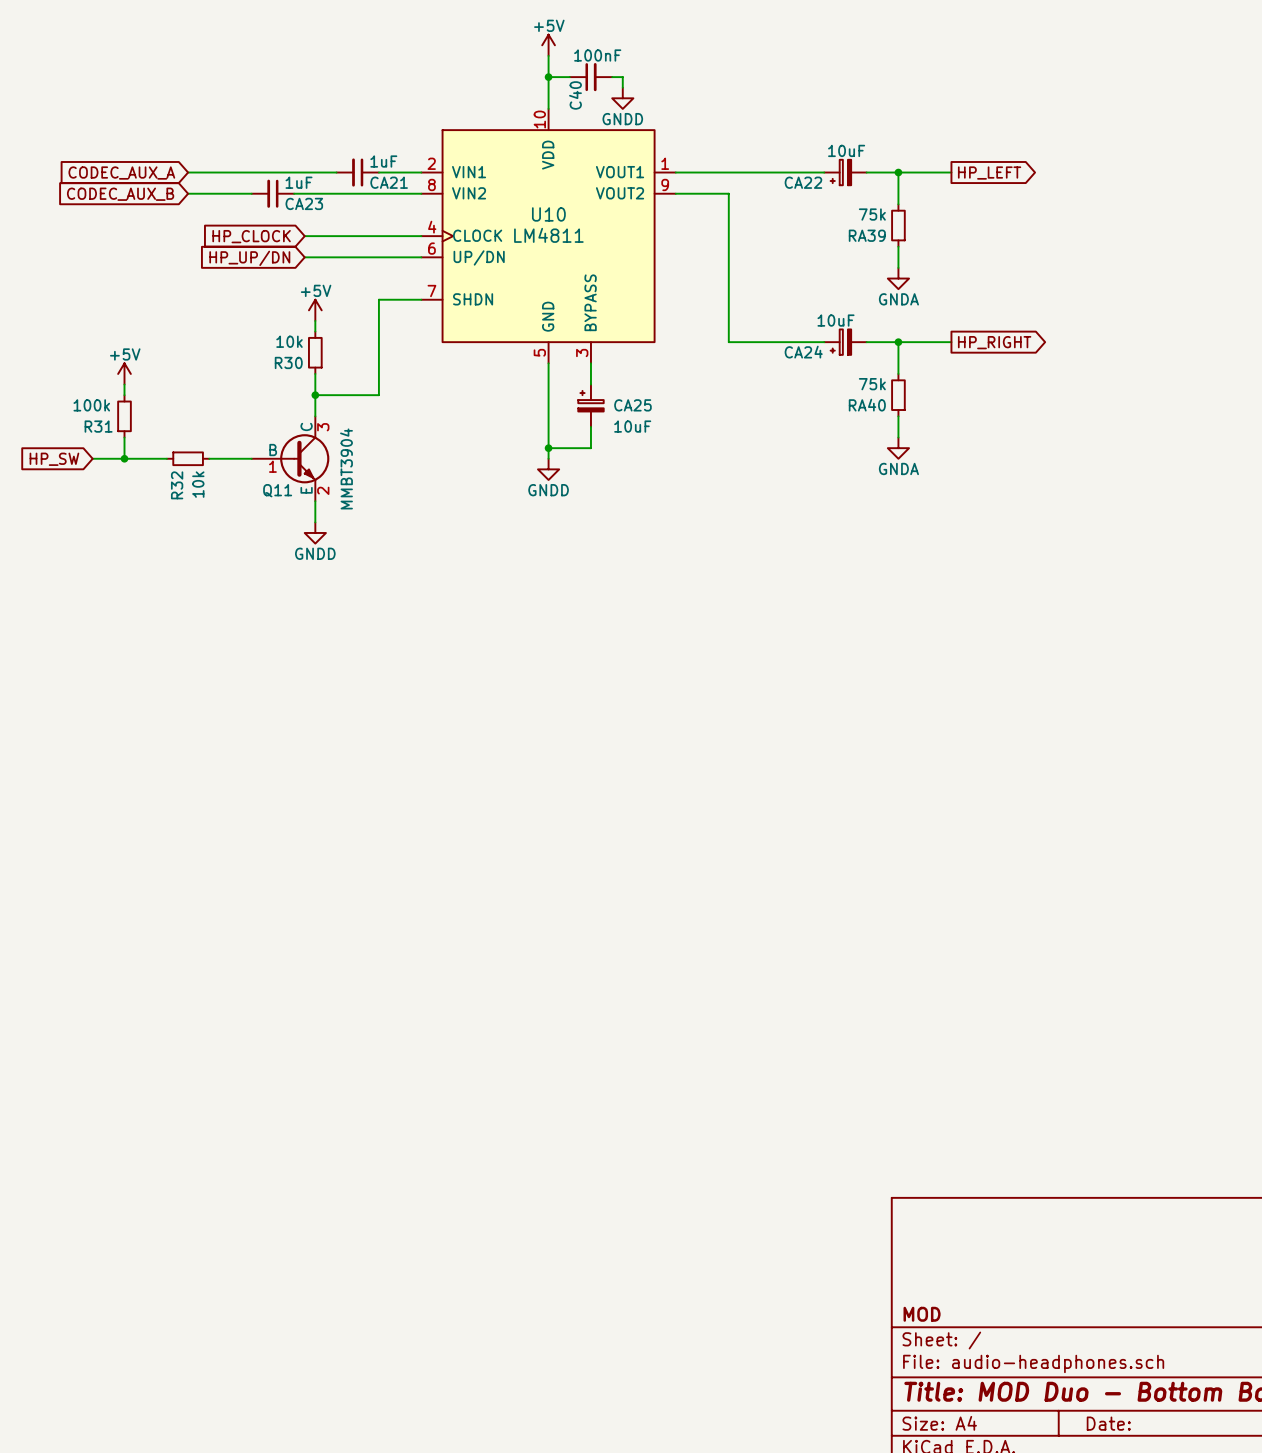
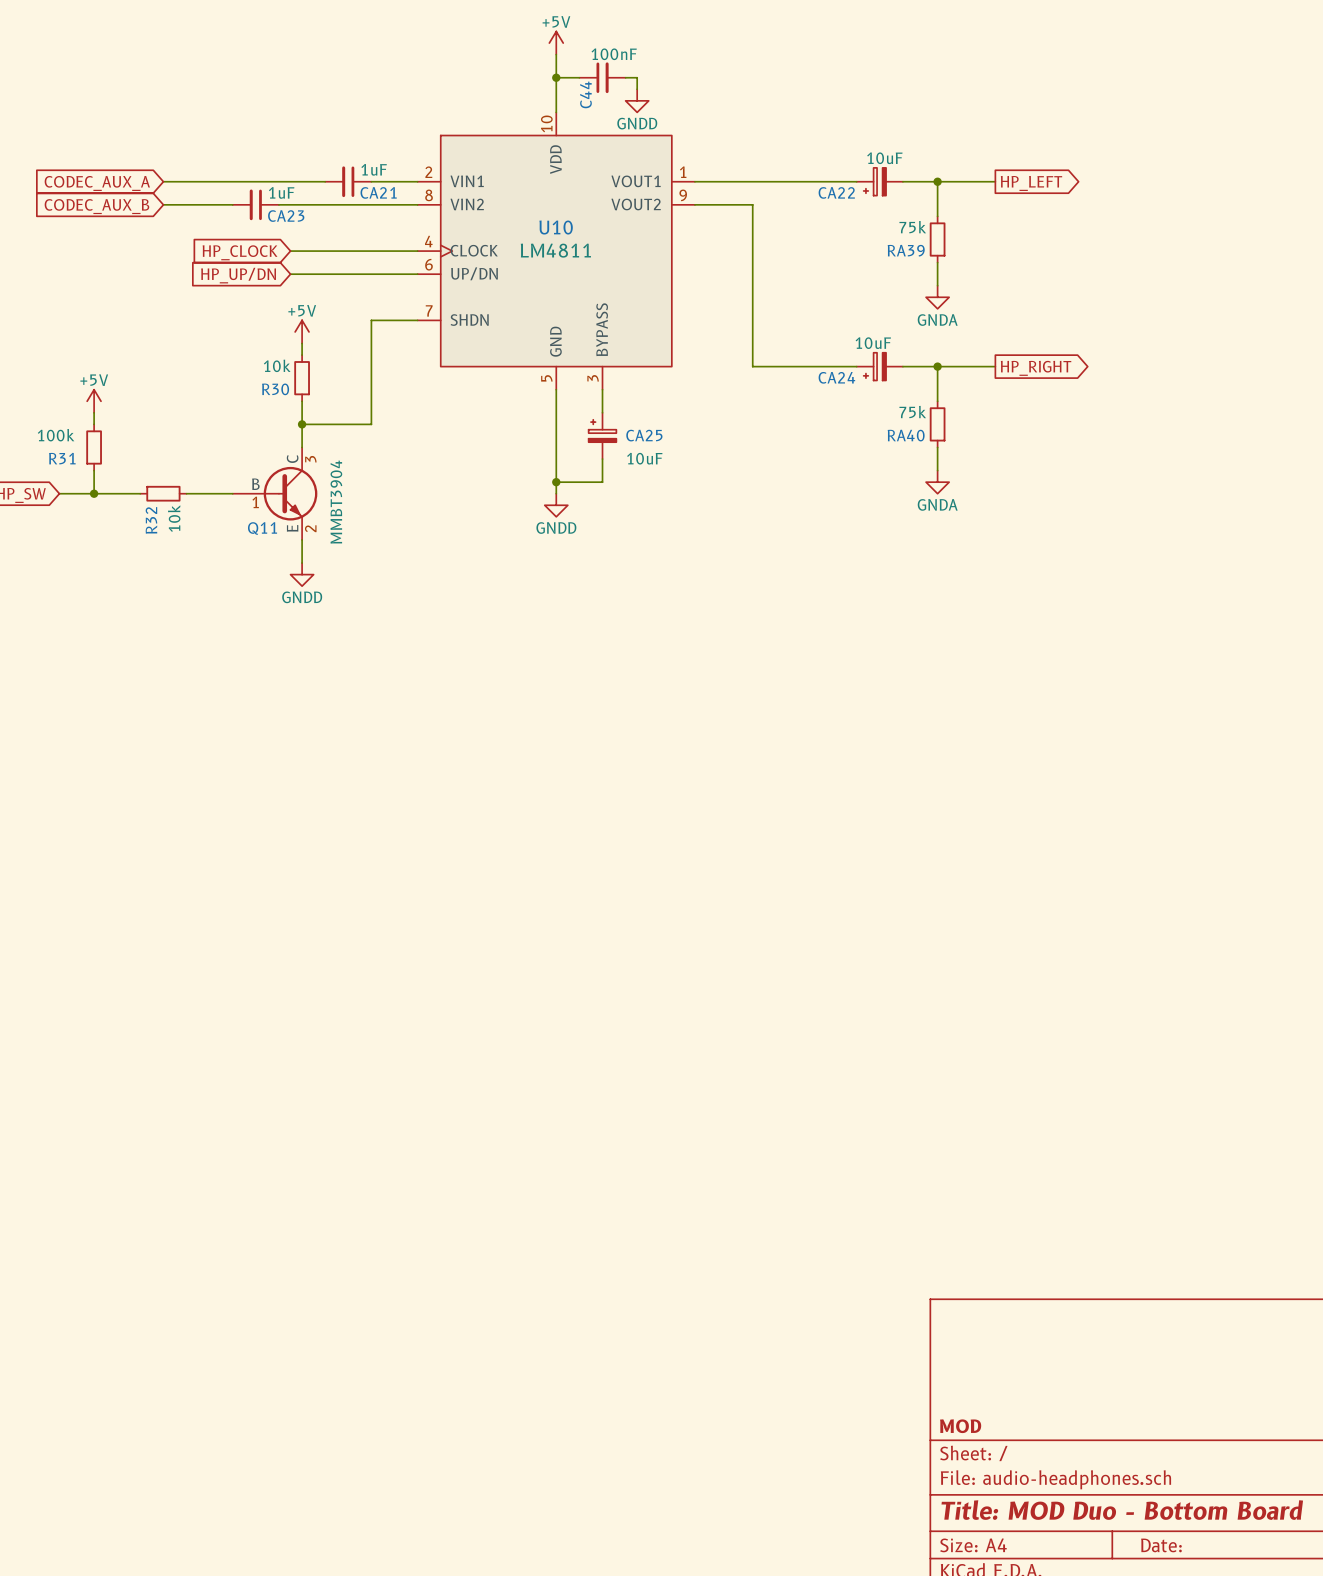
C40 name: C40 (575, 95) -> C44 (585, 94)

